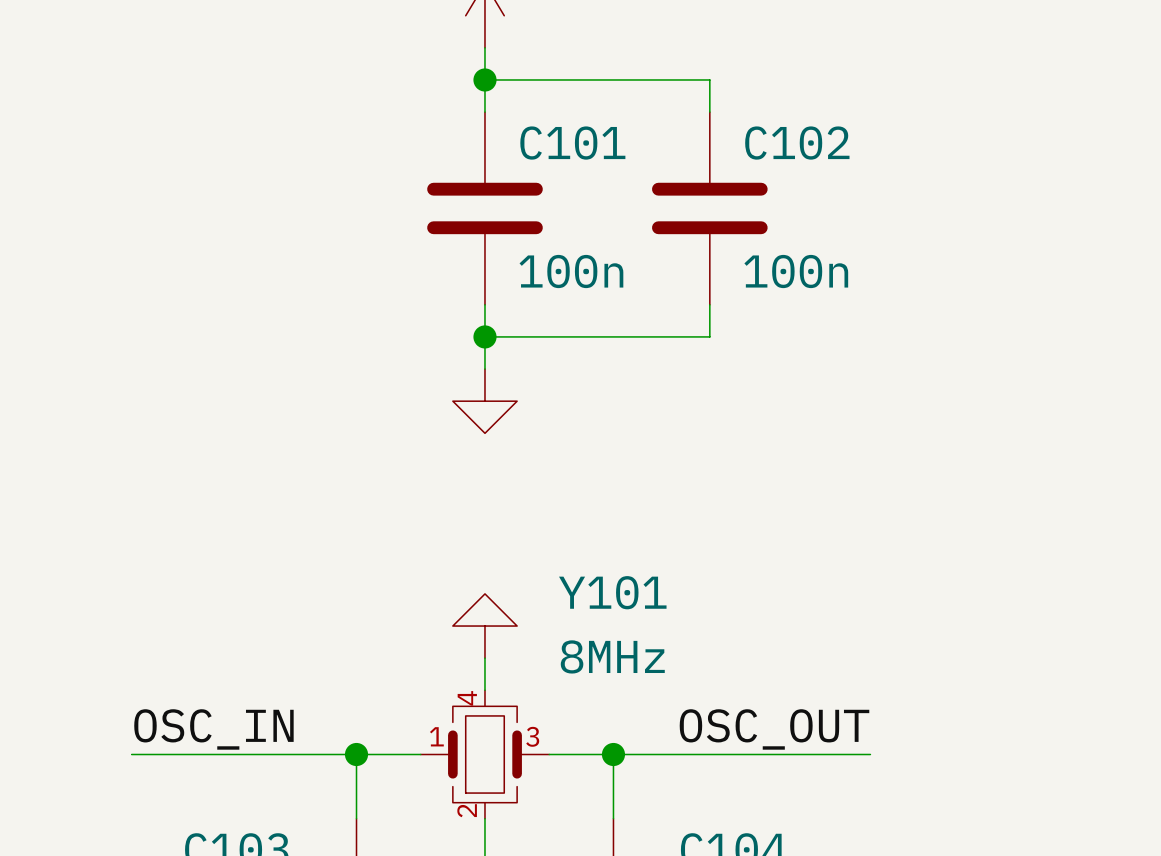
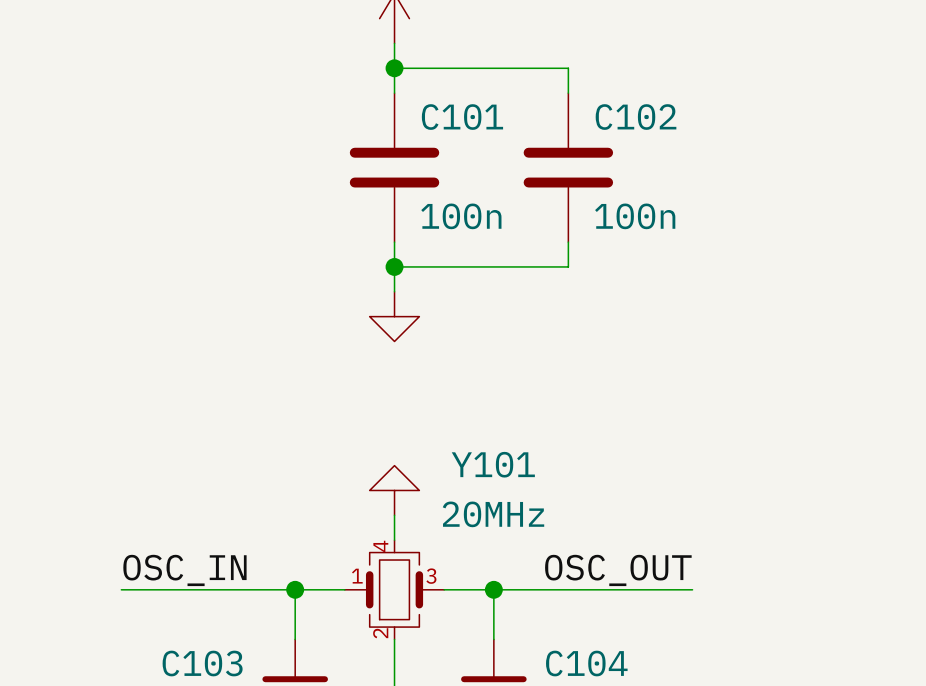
Y101 value: 8MHz (612, 656) -> 20MHz (493, 514)

